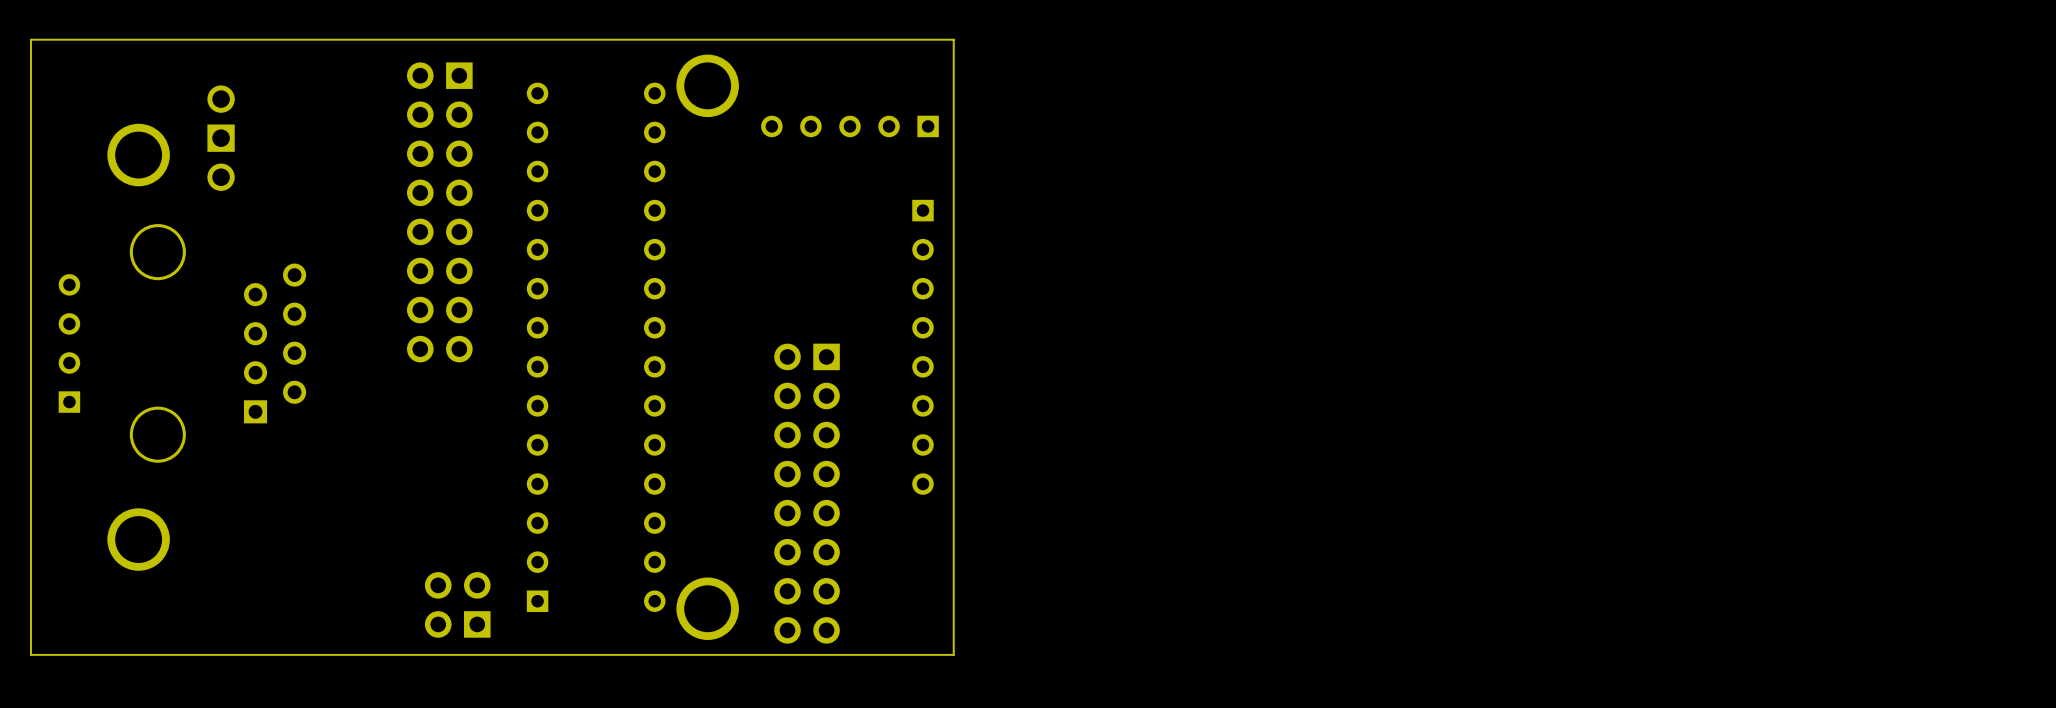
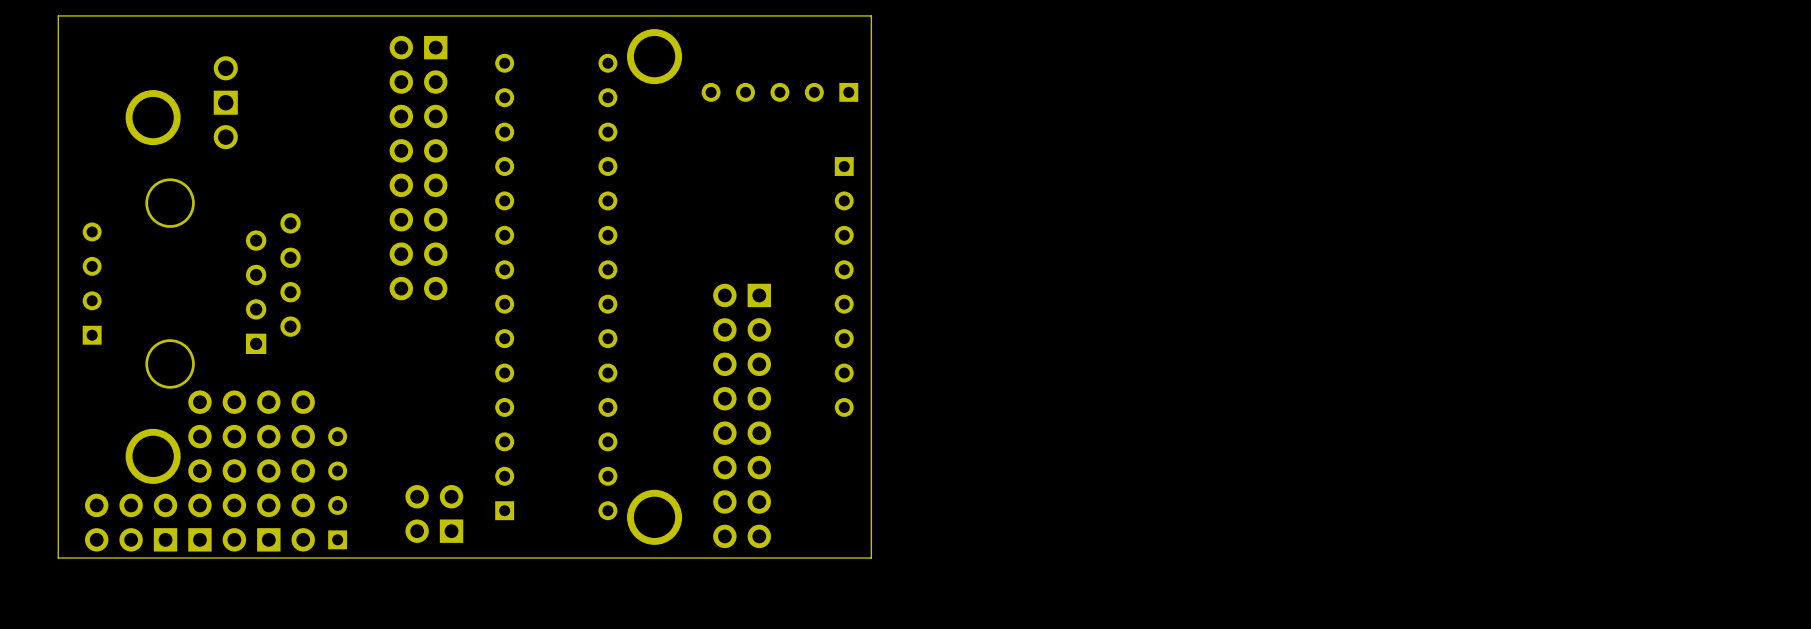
part: none -> (217, 471)
part: none -> (286, 471)
part: none -> (337, 488)
part: none -> (131, 522)

